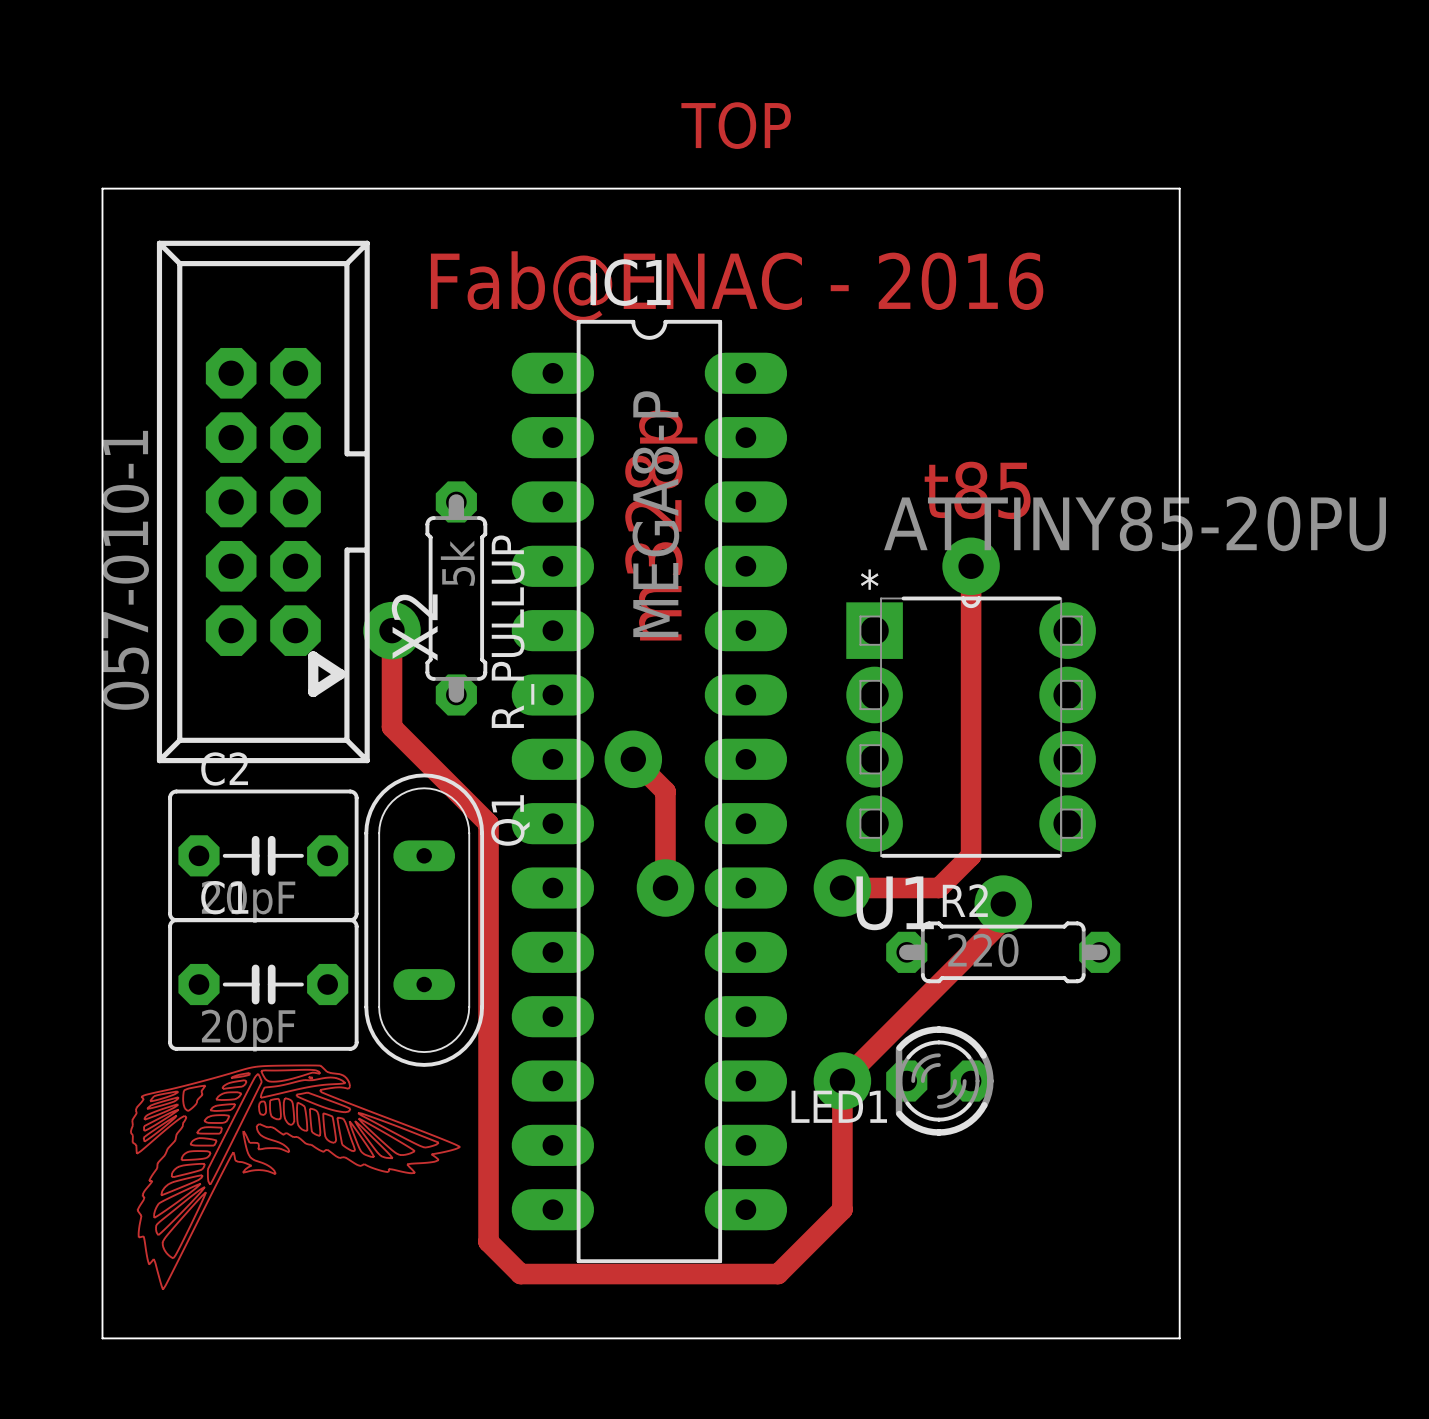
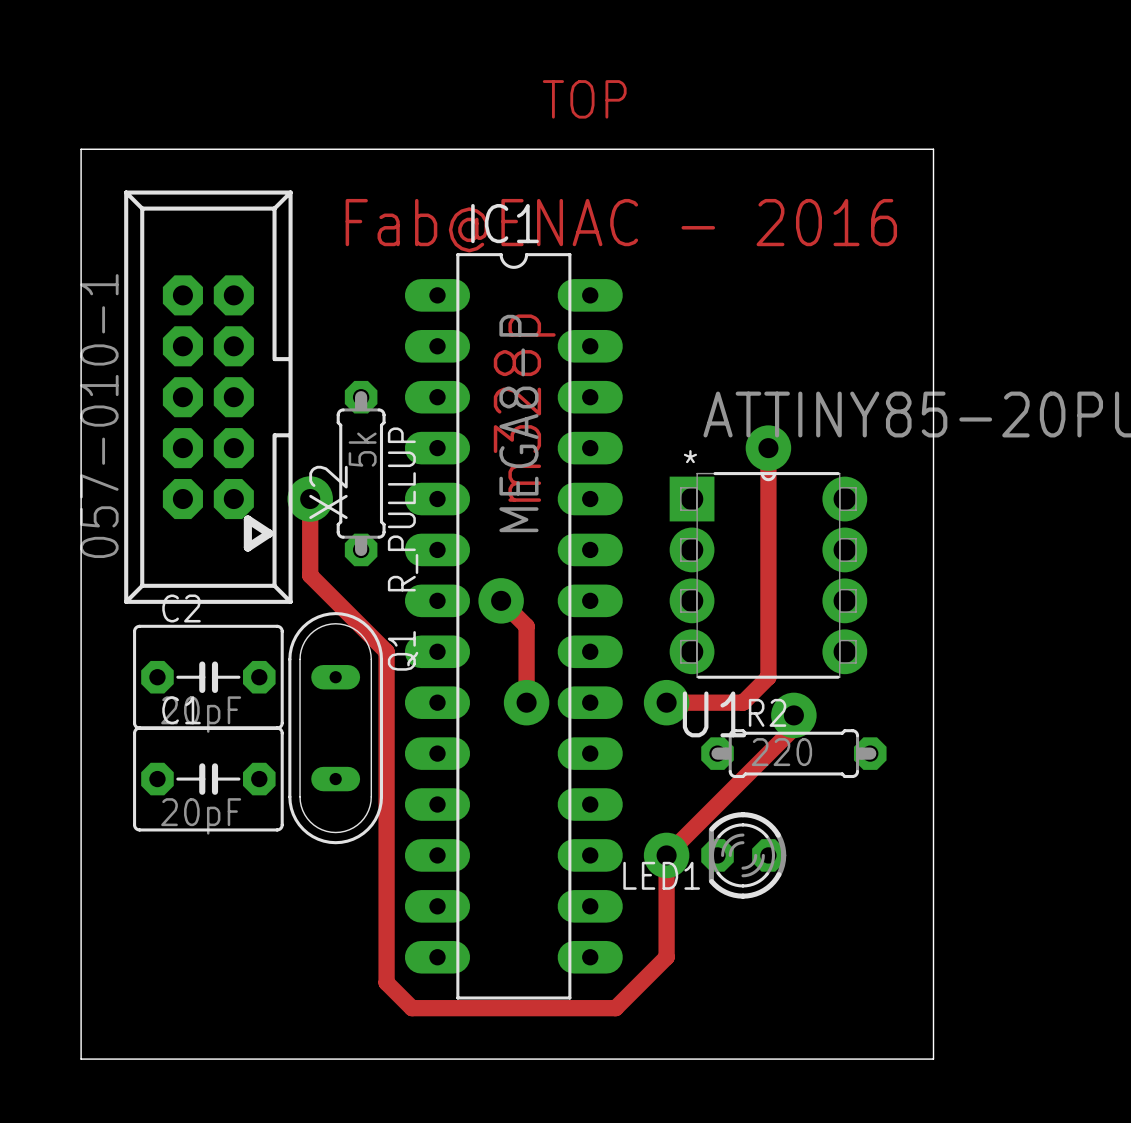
text: t85 (977, 490) -> none
zone outline: (280, 1065) (247, 1068) (141, 1096) (143, 1098) (136, 1107) (130, 1132) (132, 1135) (132, 1142) (136, 1145) (136, 1153) (177, 1120) (184, 1115) (186, 1117) (176, 1134) (175, 1140) (157, 1163) (157, 1168) (149, 1181) (152, 1181) (144, 1191) (143, 1199) (137, 1210) (141, 1215) (138, 1237) (143, 1236) (149, 1264) (153, 1259) (162, 1289) (233, 1152) (235, 1160) (251, 1165) (242, 1172) (259, 1170) (275, 1174) (270, 1166) (250, 1157) (246, 1149) (243, 1131) (249, 1142) (258, 1143) (258, 1149) (276, 1148) (289, 1152) (283, 1144) (260, 1134) (256, 1125) (259, 1124) (274, 1128) (283, 1135) (286, 1133) (293, 1137) (297, 1136) (319, 1150) (323, 1152) (327, 1149) (336, 1156) (345, 1157) (357, 1165) (364, 1164) (388, 1172) (388, 1168) (415, 1172) (407, 1164) (435, 1161) (438, 1159) (431, 1154) (460, 1146) (320, 1091) (320, 1090) (336, 1087) (348, 1088) (349, 1082) (344, 1075) (327, 1071) (320, 1065) (280, 1065) -> none
zone outline: (297, 1069) (315, 1070) (319, 1073) (313, 1072) (287, 1079) (272, 1081) (265, 1079) (261, 1070) (297, 1069) -> none
zone outline: (249, 1072) (250, 1074) (247, 1075) (231, 1077) (249, 1072) -> none
zone outline: (258, 1073) (261, 1081) (210, 1184) (207, 1169) (258, 1073) -> none
zone outline: (308, 1077) (312, 1077) (311, 1078) (308, 1077) -> none
zone outline: (331, 1077) (345, 1083) (310, 1086) (260, 1097) (264, 1087) (331, 1077) -> none
zone outline: (244, 1080) (246, 1081) (242, 1086) (222, 1089) (222, 1087) (229, 1083) (244, 1080) -> none
zone outline: (205, 1085) (196, 1103) (187, 1111) (183, 1104) (183, 1090) (205, 1085) -> none
zone outline: (176, 1091) (178, 1092) (170, 1096) (150, 1101) (154, 1096) (176, 1091) -> none
zone outline: (233, 1092) (241, 1093) (235, 1099) (216, 1099) (222, 1093) (233, 1092) -> none
zone outline: (307, 1092) (341, 1105) (350, 1108) (349, 1111) (344, 1112) (335, 1110) (296, 1096) (296, 1094) (307, 1092) -> none
zone outline: (178, 1097) (174, 1101) (147, 1108) (154, 1104) (178, 1097) -> none
zone outline: (278, 1098) (281, 1115) (280, 1119) (277, 1119) (271, 1116) (270, 1100) (278, 1098) -> none
zone outline: (285, 1098) (292, 1102) (294, 1122) (291, 1124) (285, 1119) (285, 1098) -> none
zone outline: (262, 1101) (264, 1101) (265, 1105) (266, 1112) (263, 1115) (260, 1114) (259, 1110) (259, 1102) (262, 1101) -> none
zone outline: (297, 1102) (304, 1106) (307, 1130) (302, 1129) (297, 1124) (297, 1102) -> none
zone outline: (177, 1104) (171, 1109) (144, 1119) (149, 1113) (177, 1104) -> none
zone outline: (235, 1104) (230, 1110) (210, 1110) (216, 1105) (235, 1104) -> none
zone outline: (309, 1108) (316, 1110) (318, 1113) (319, 1136) (311, 1132) (309, 1108) -> none
zone outline: (178, 1109) (160, 1121) (144, 1131) (144, 1126) (178, 1109) -> none
zone outline: (358, 1113) (381, 1120) (438, 1142) (424, 1147) (358, 1113) -> none
zone outline: (215, 1115) (225, 1115) (229, 1115) (226, 1121) (222, 1122) (204, 1121) (207, 1117) (215, 1115) -> none
zone outline: (337, 1117) (343, 1118) (345, 1122) (355, 1150) (350, 1150) (342, 1144) (337, 1117) -> none
zone outline: (358, 1118) (391, 1136) (414, 1151) (404, 1155) (396, 1153) (358, 1118) -> none
zone outline: (349, 1121) (364, 1141) (374, 1157) (361, 1151) (349, 1121) -> none
zone outline: (355, 1121) (379, 1144) (392, 1158) (381, 1156) (355, 1121) -> none
zone outline: (209, 1127) (221, 1127) (221, 1131) (219, 1133) (196, 1133) (201, 1128) (209, 1127) -> none
zone outline: (151, 1136) (144, 1141) (143, 1137) (176, 1115) (151, 1136) -> none
zone outline: (198, 1138) (207, 1138) (216, 1140) (214, 1145) (190, 1144) (192, 1141) (198, 1138) -> none
zone outline: (336, 1140) (334, 1142) (330, 1142) (325, 1136) (323, 1113) (332, 1116) (336, 1140) -> none
zone outline: (196, 1151) (210, 1152) (206, 1158) (181, 1160) (185, 1153) (196, 1151) -> none
zone outline: (200, 1163) (204, 1163) (202, 1169) (171, 1176) (172, 1172) (177, 1167) (200, 1163) -> none
zone outline: (202, 1175) (198, 1179) (161, 1195) (162, 1191) (168, 1184) (202, 1175) -> none
zone outline: (200, 1183) (181, 1198) (154, 1217) (158, 1203) (200, 1183) -> none
zone outline: (204, 1187) (186, 1207) (158, 1235) (156, 1225) (204, 1187) -> none
zone outline: (205, 1192) (183, 1239) (173, 1258) (164, 1250) (162, 1242) (205, 1192) -> none

